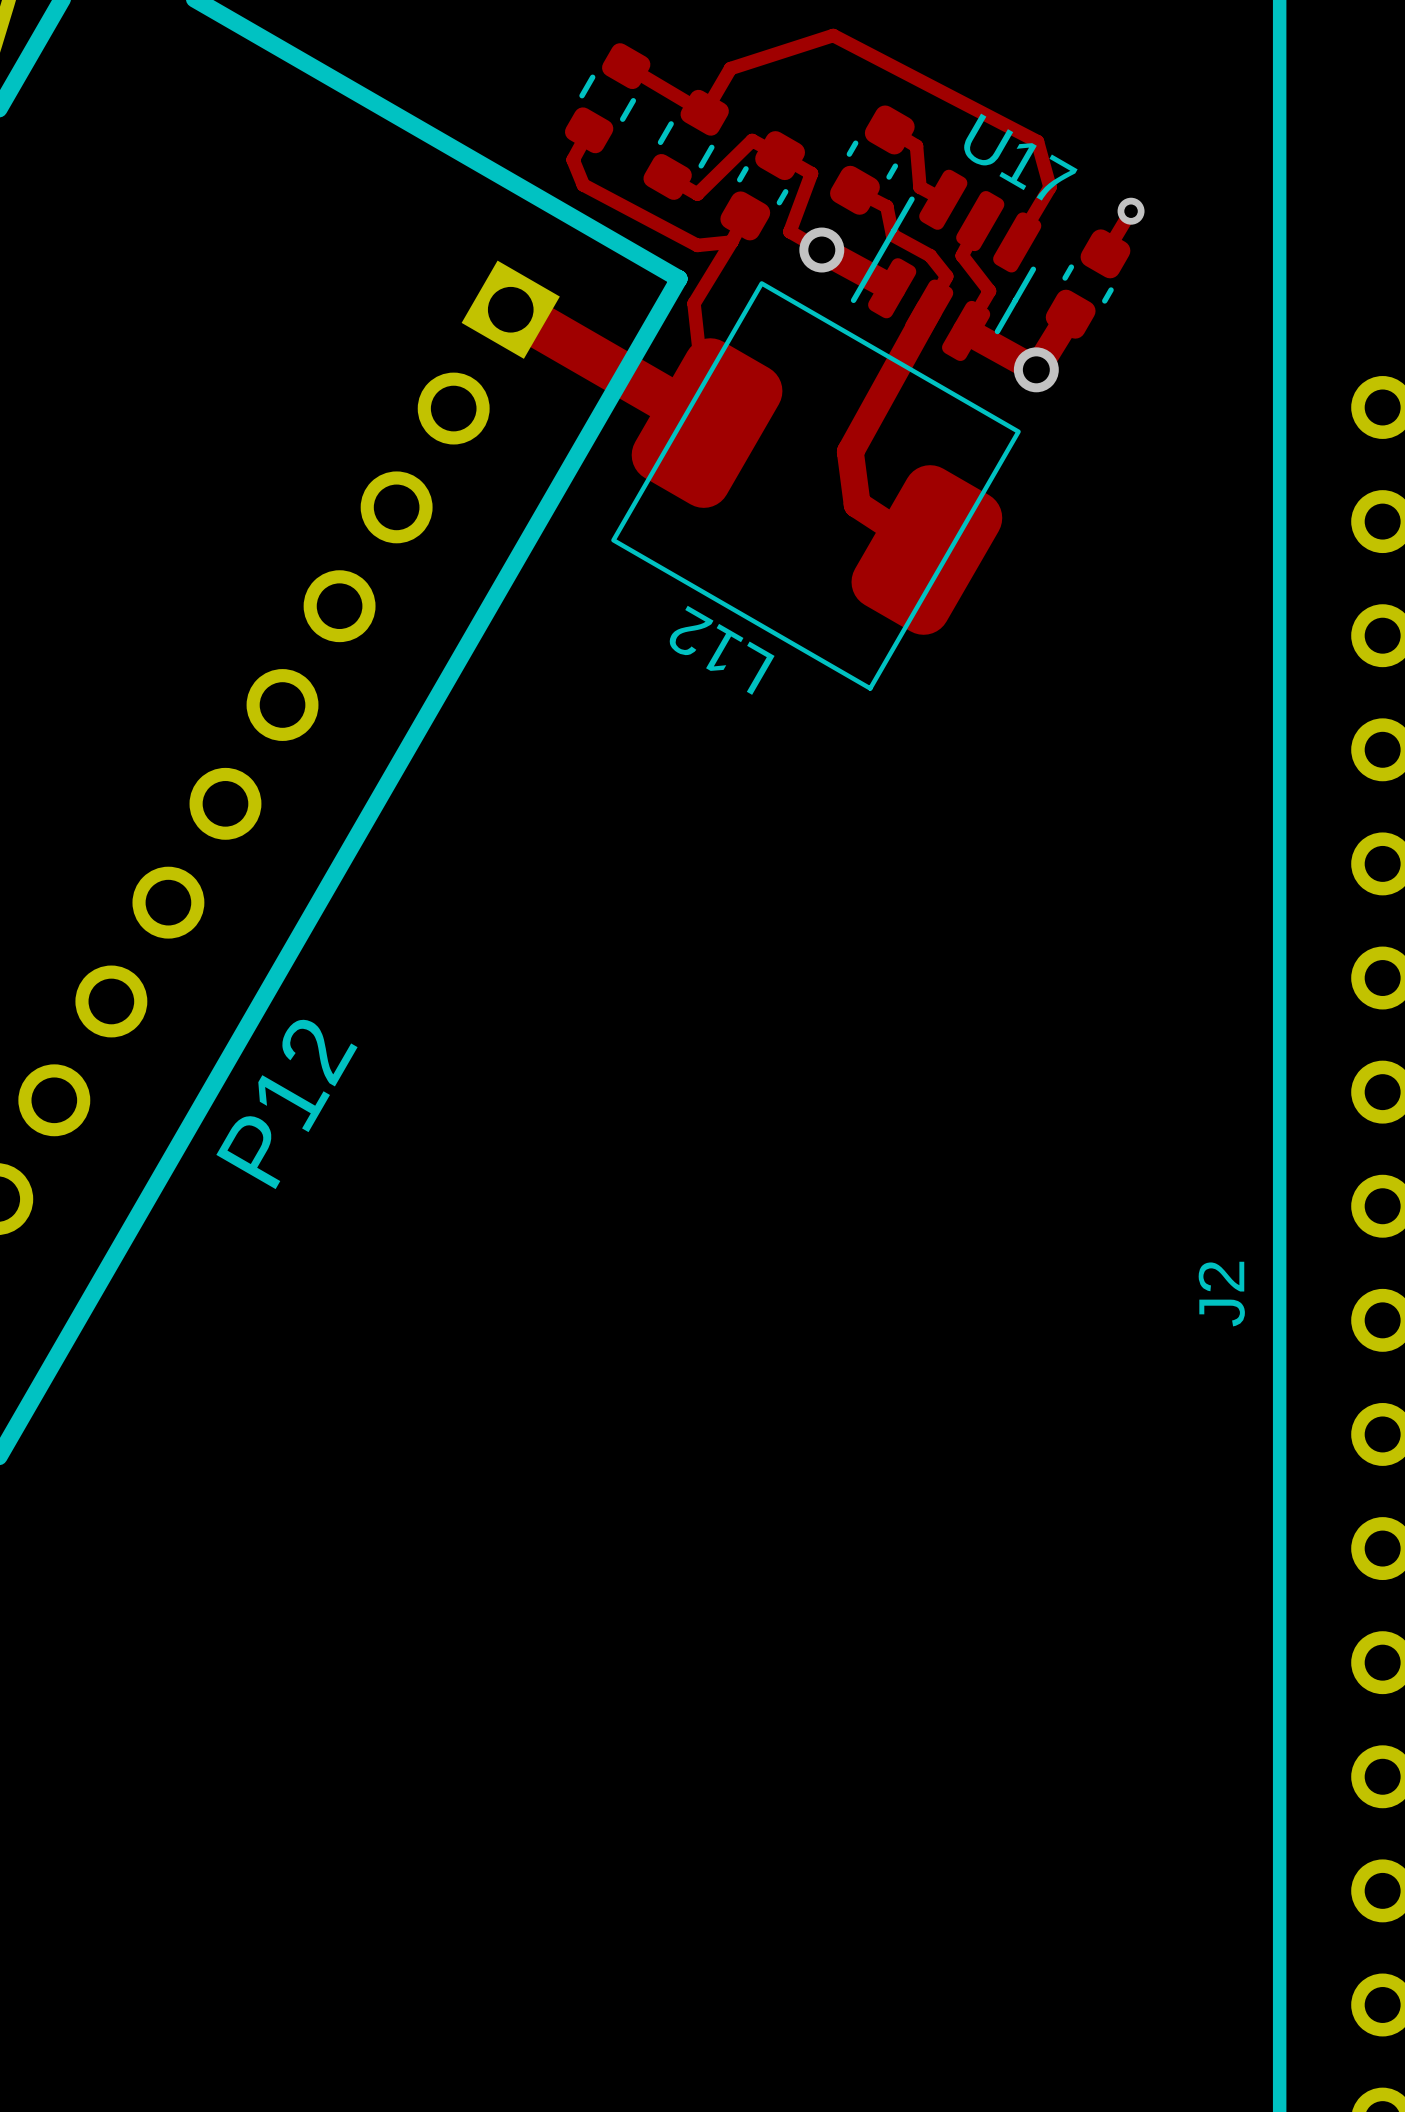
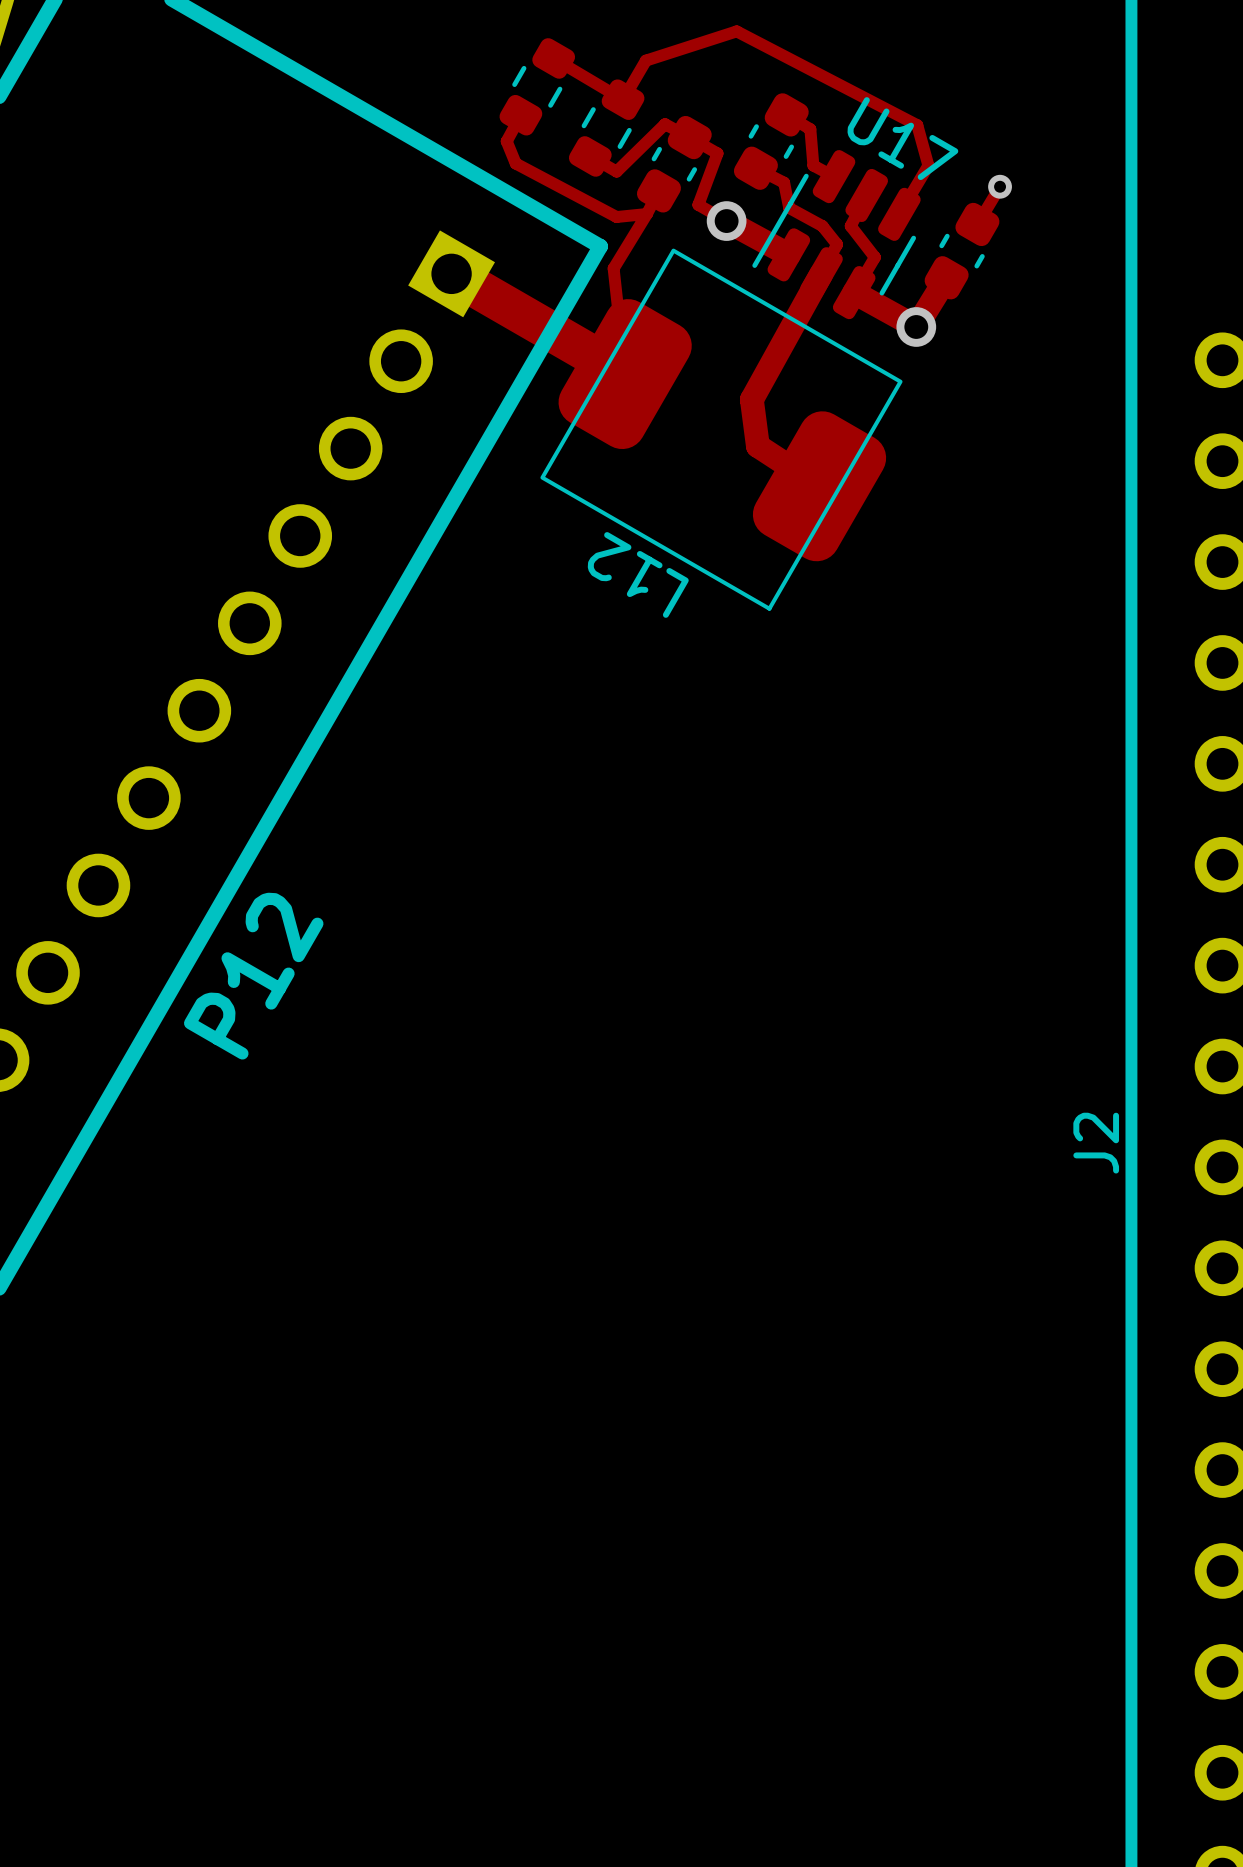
J2 name position: J2 (1221, 1294) -> J2 (1096, 1143)

